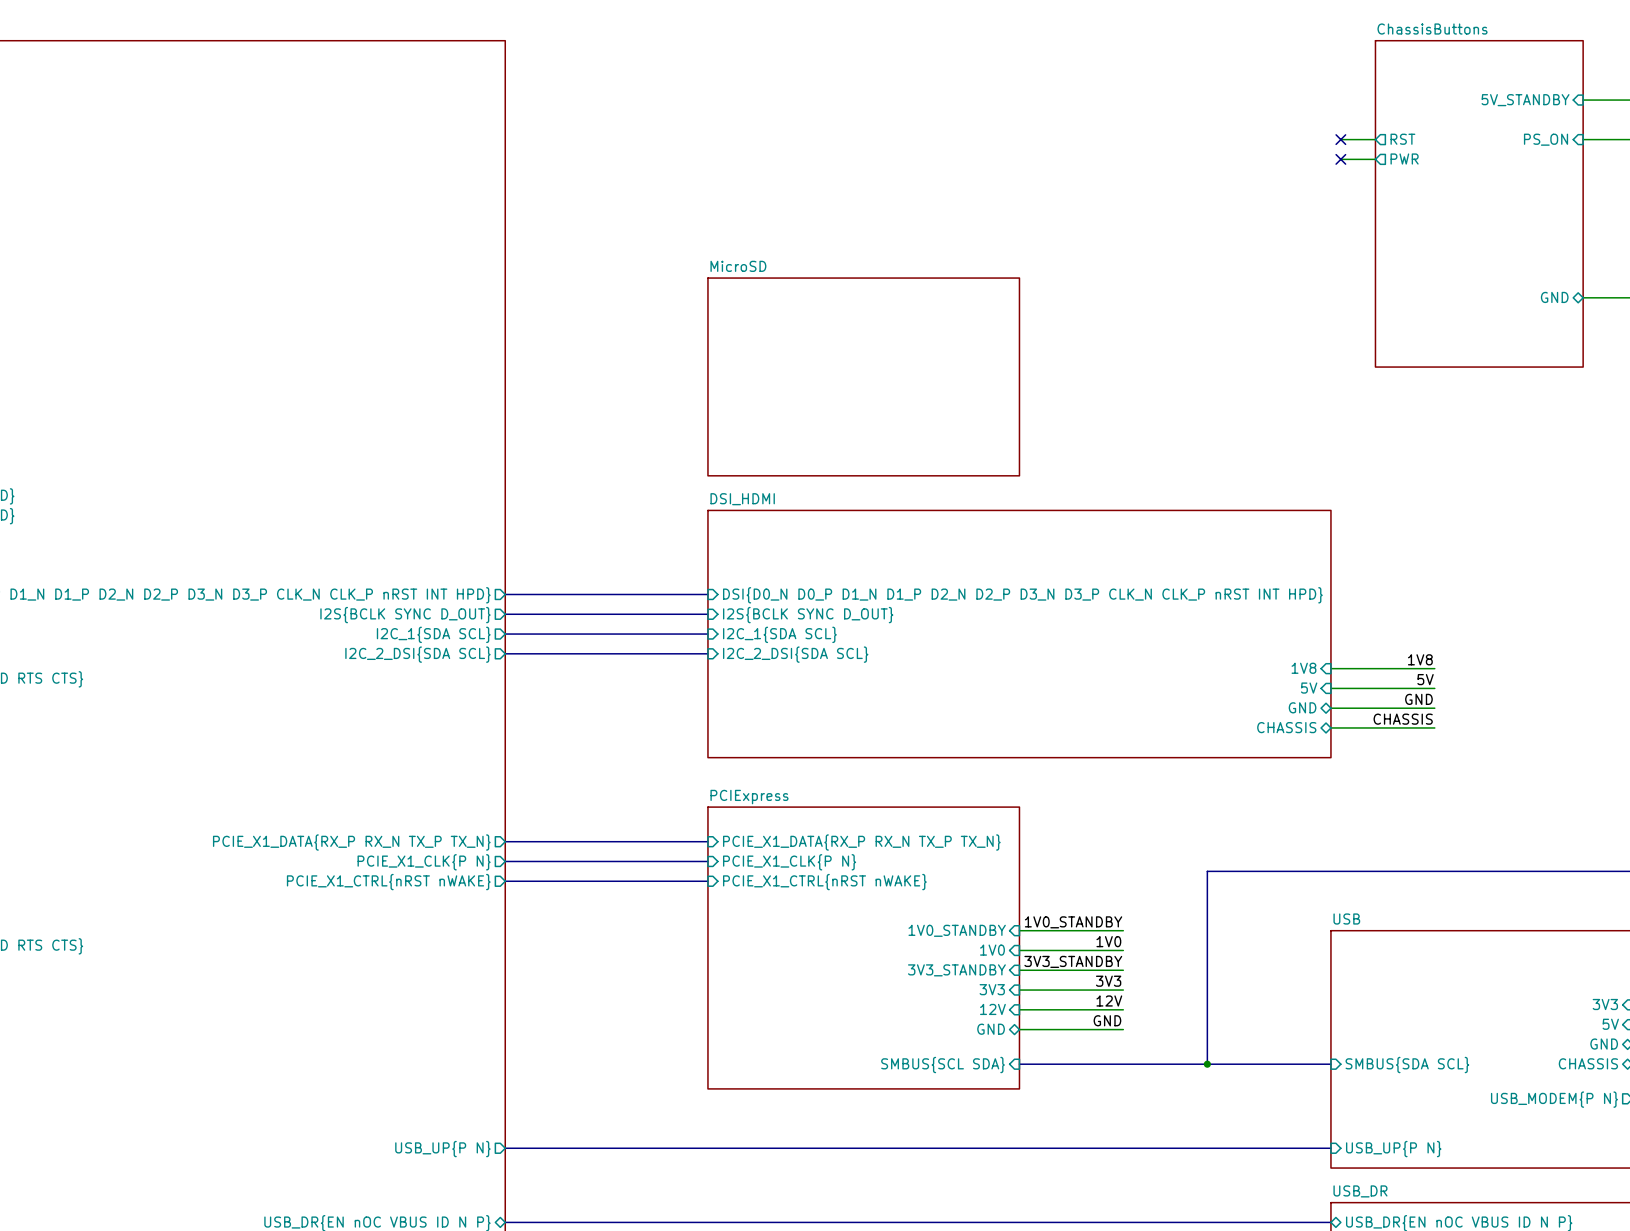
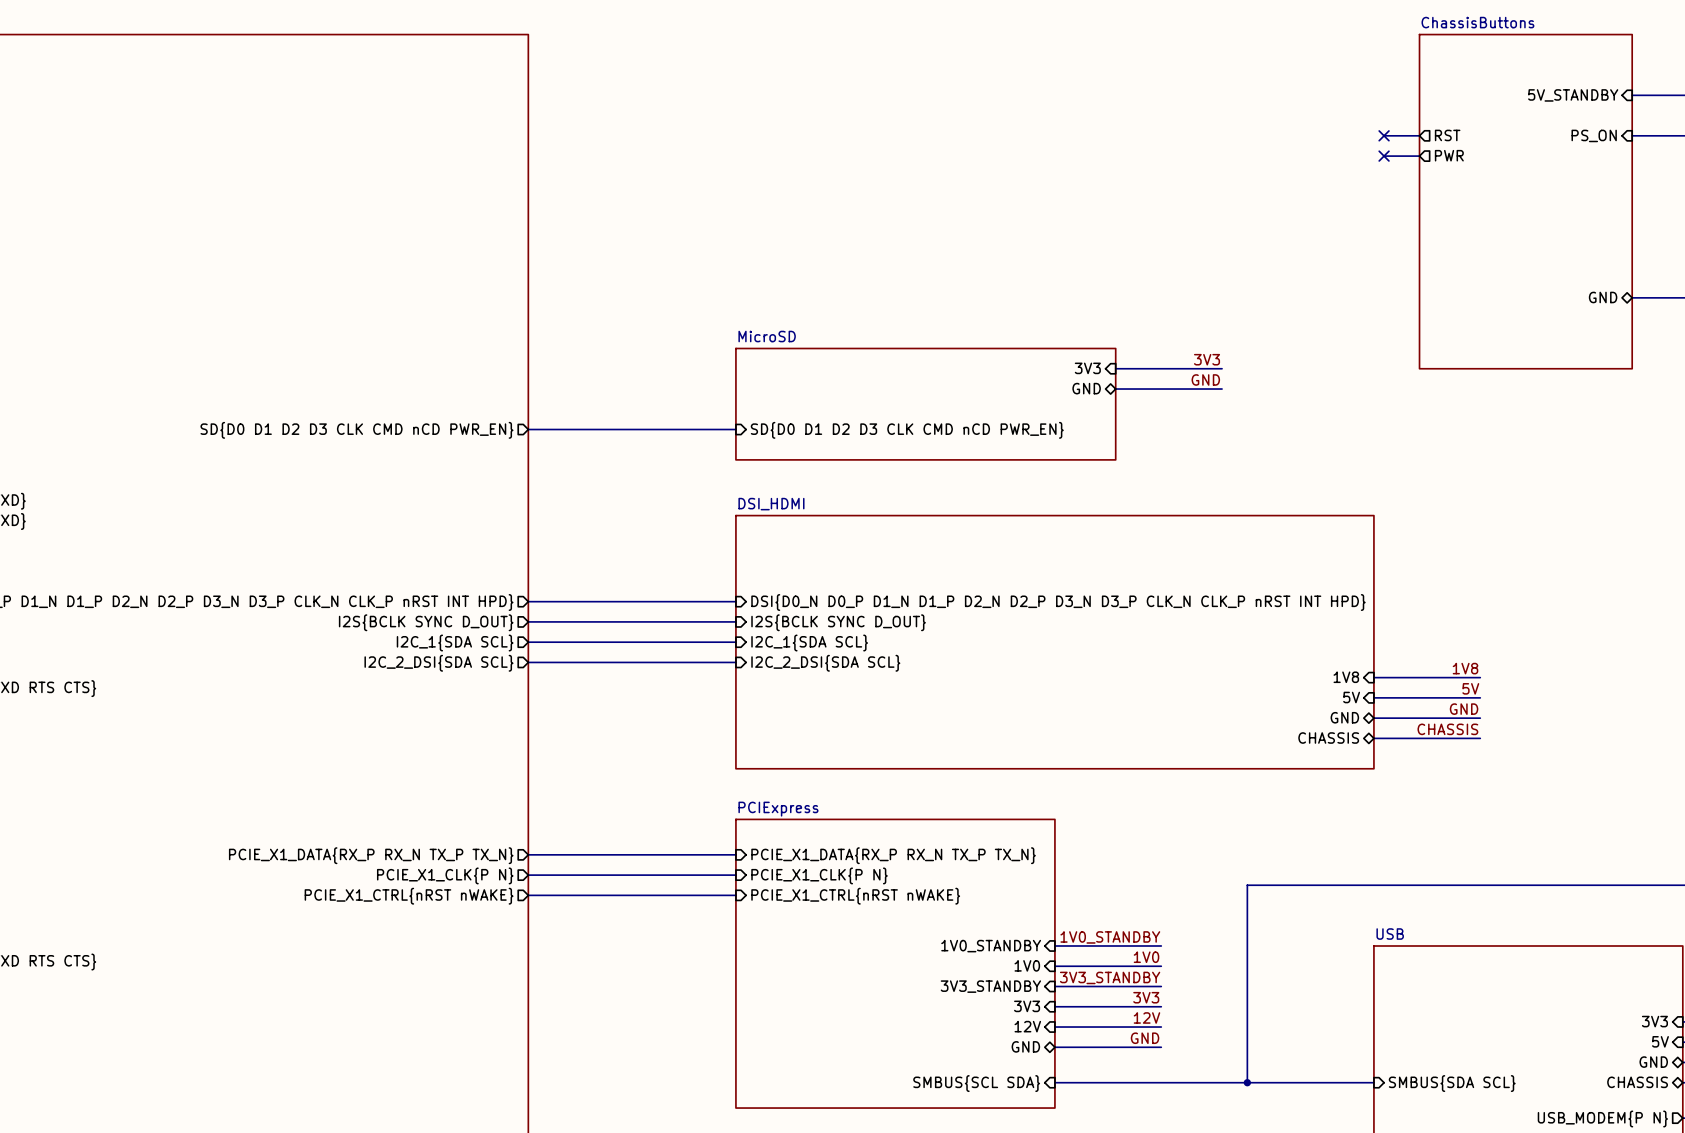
label: none -> 3V3 (1207, 359)
sheet pin: none -> 3V3 (1087, 368)
wire: none -> (1115, 368) (1222, 368)
sheet MicroSD: (863, 376) -> none
label: none -> GND (1205, 379)
sheet pin: none -> GND (1086, 388)
wire: none -> (1115, 389) (1222, 389)
sheet MicroSD: none -> (925, 404)
bus: none -> (528, 429) (735, 429)
sheet pin: none -> SD{D0 D1 D2 D3 CLK CMD nCD PWR_EN} (356, 430)
sheet pin: none -> SD{D0 D1 D2 D3 CLK CMD nCD PWR_EN} (907, 430)

